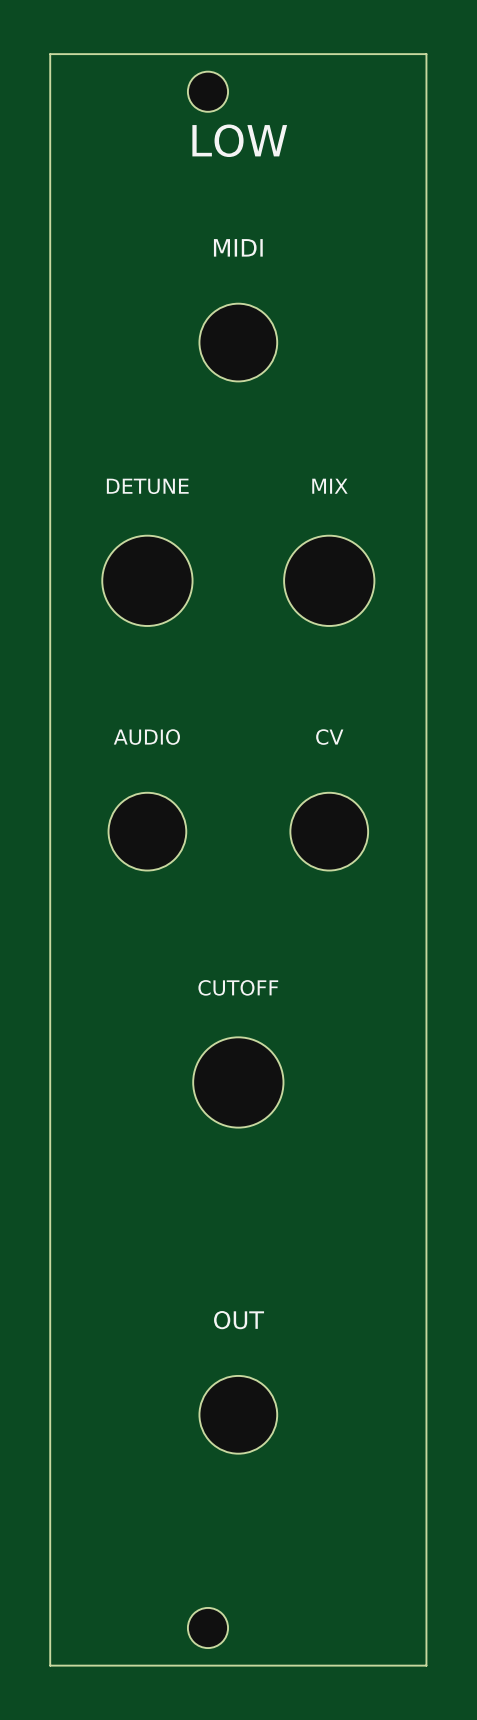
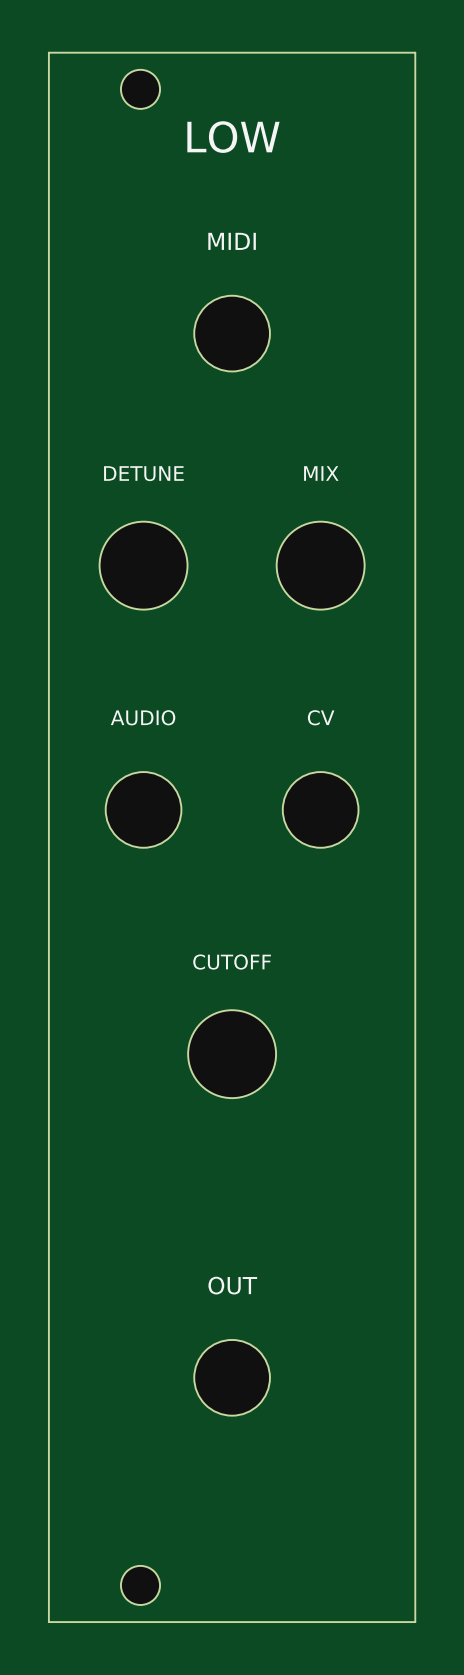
part position: (207, 91) -> (140, 89)
part position: (207, 1628) -> (140, 1585)

